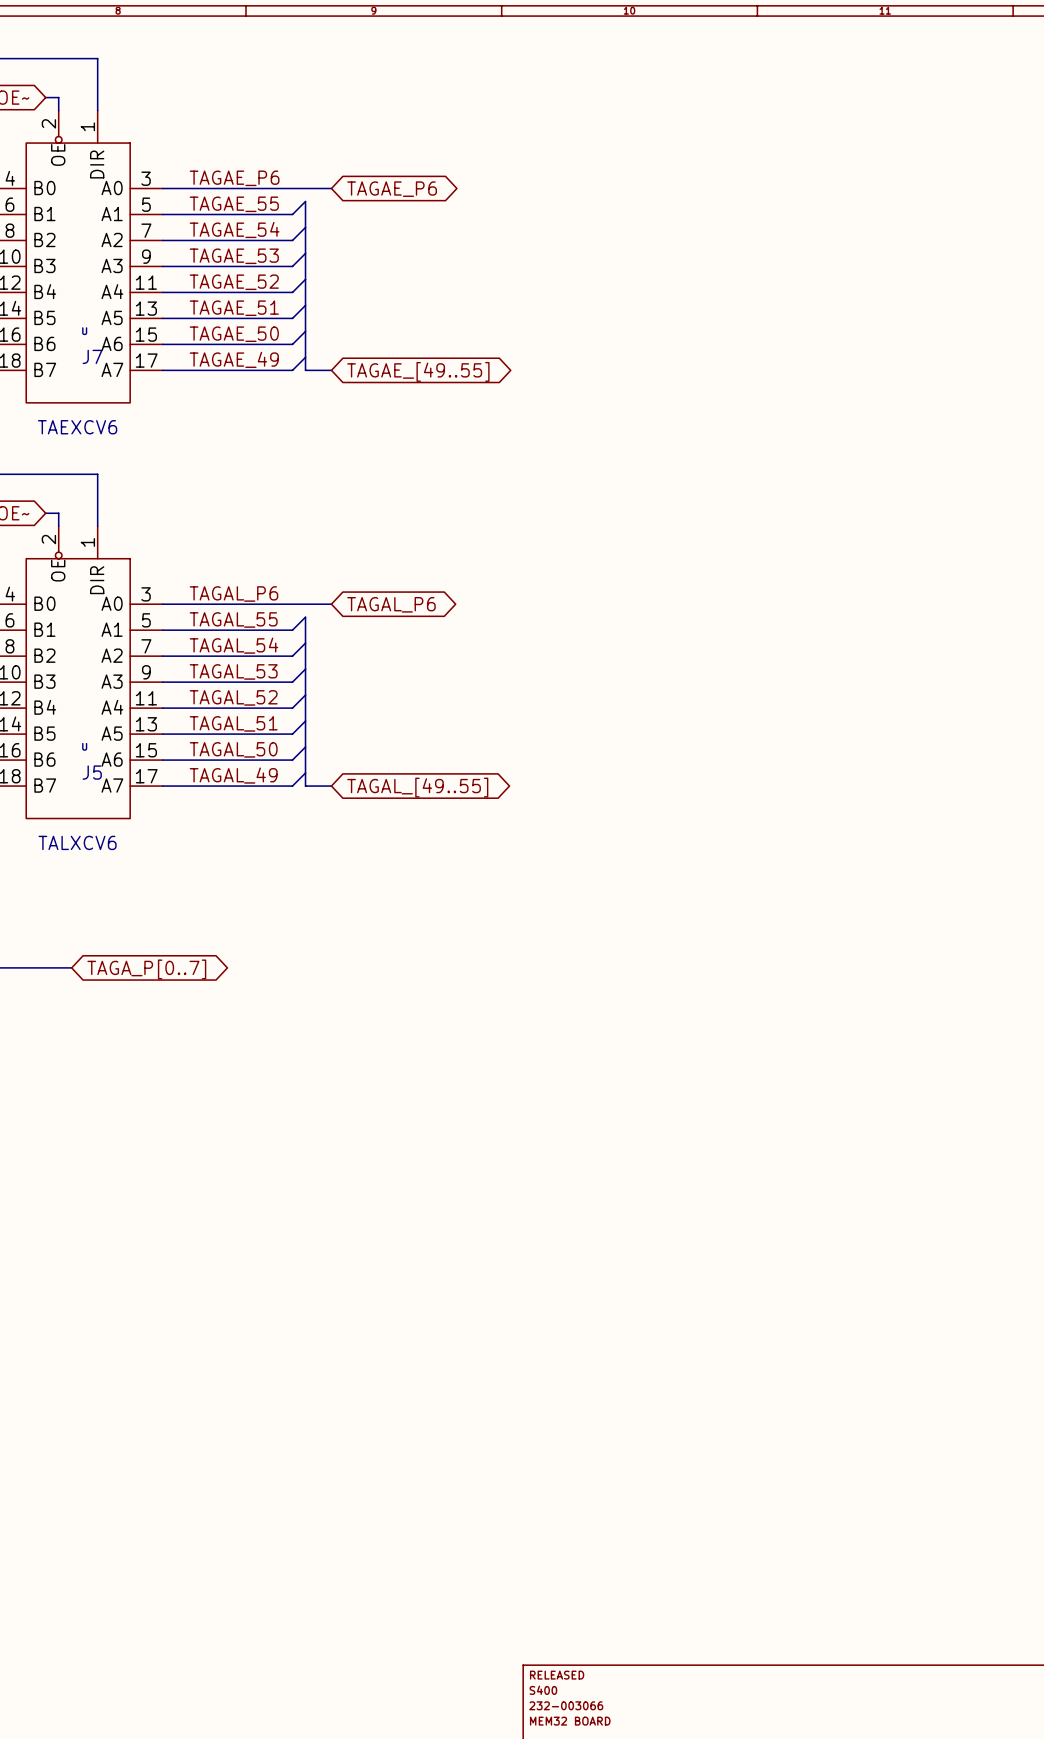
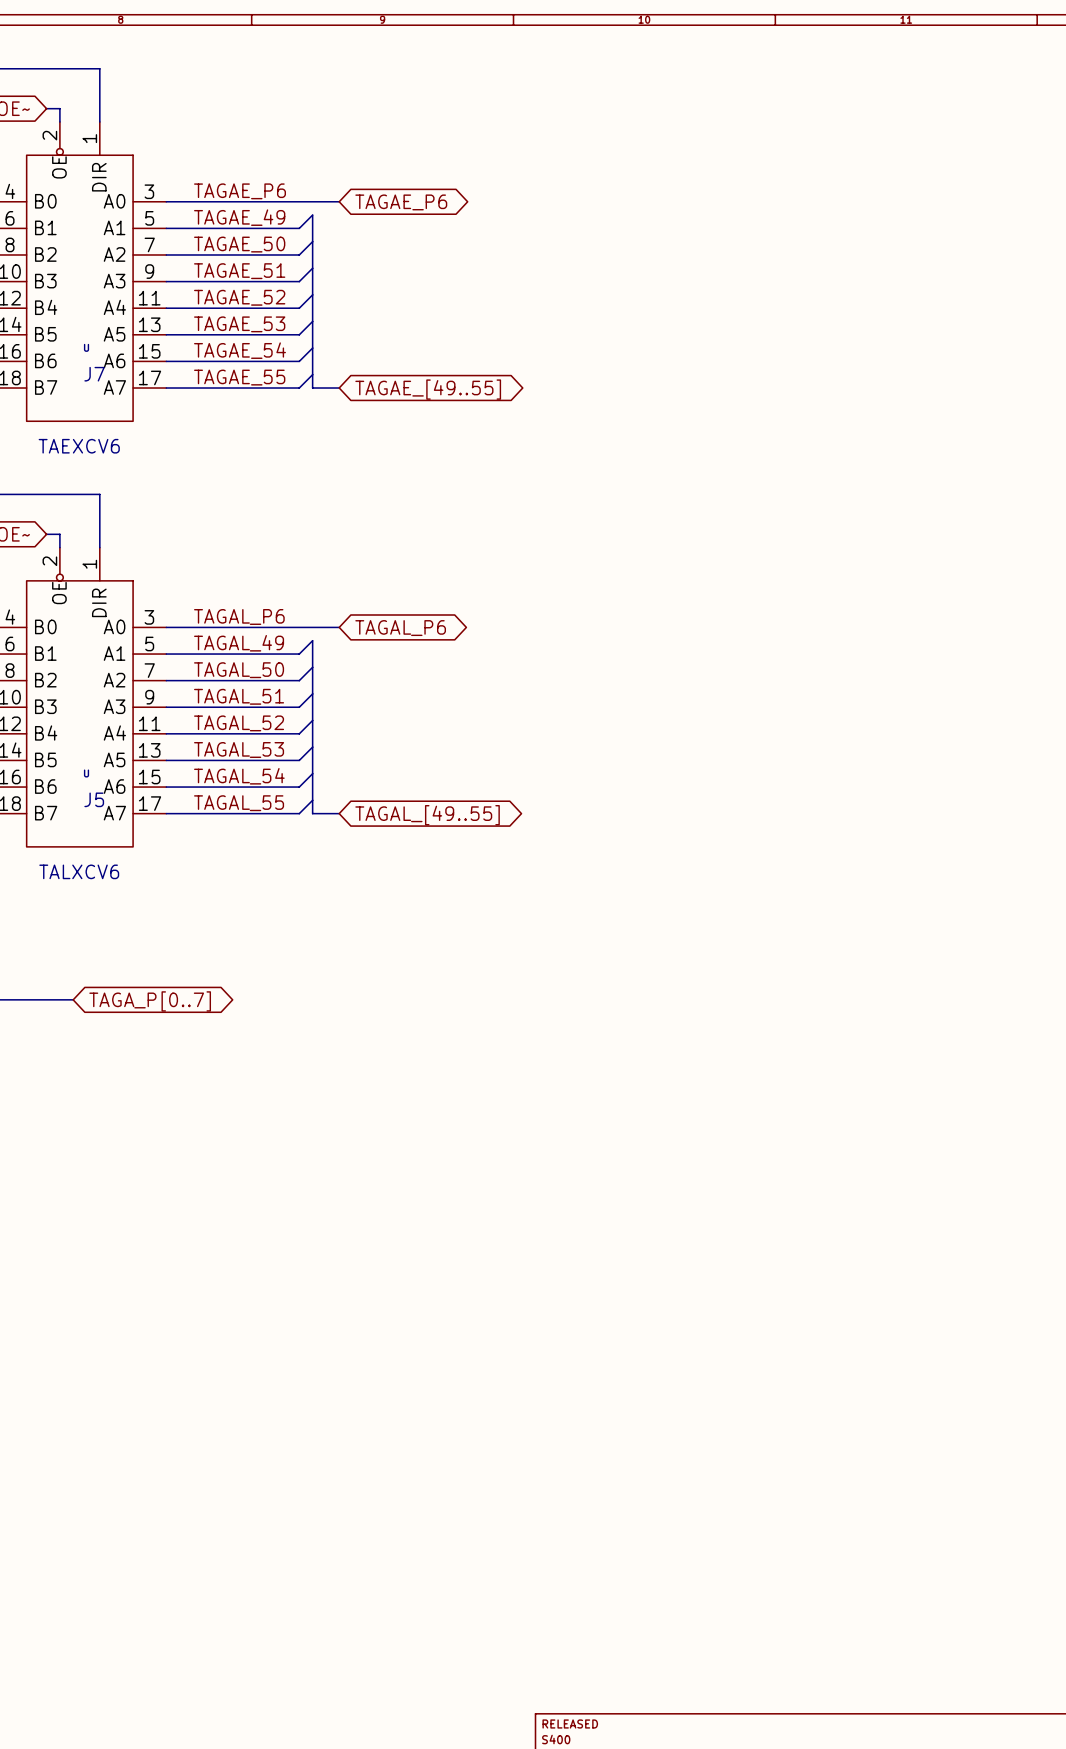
label: TAGAE_55 (234, 204) -> TAGAE_49 (239, 217)
label: TAGAE_54 (234, 229) -> TAGAE_50 (239, 244)
label: TAGAE_53 (234, 256) -> TAGAE_51 (239, 271)
label: TAGAE_51 (234, 308) -> TAGAE_53 (239, 324)
label: TAGAE_50 (234, 334) -> TAGAE_54 (240, 350)
label: TAGAE_49 (234, 359) -> TAGAE_55 (239, 377)
label: TAGAL_55 (233, 619) -> TAGAL_49 (239, 643)
label: TAGAL_54 (233, 645) -> TAGAL_50 (239, 670)
label: TAGAL_53 (233, 671) -> TAGAL_51 (239, 696)
label: TAGAL_51 (233, 723) -> TAGAL_53 (239, 749)
label: TAGAL_50 (233, 749) -> TAGAL_54 (239, 776)
label: TAGAL_49 (233, 775) -> TAGAL_55 (239, 803)

